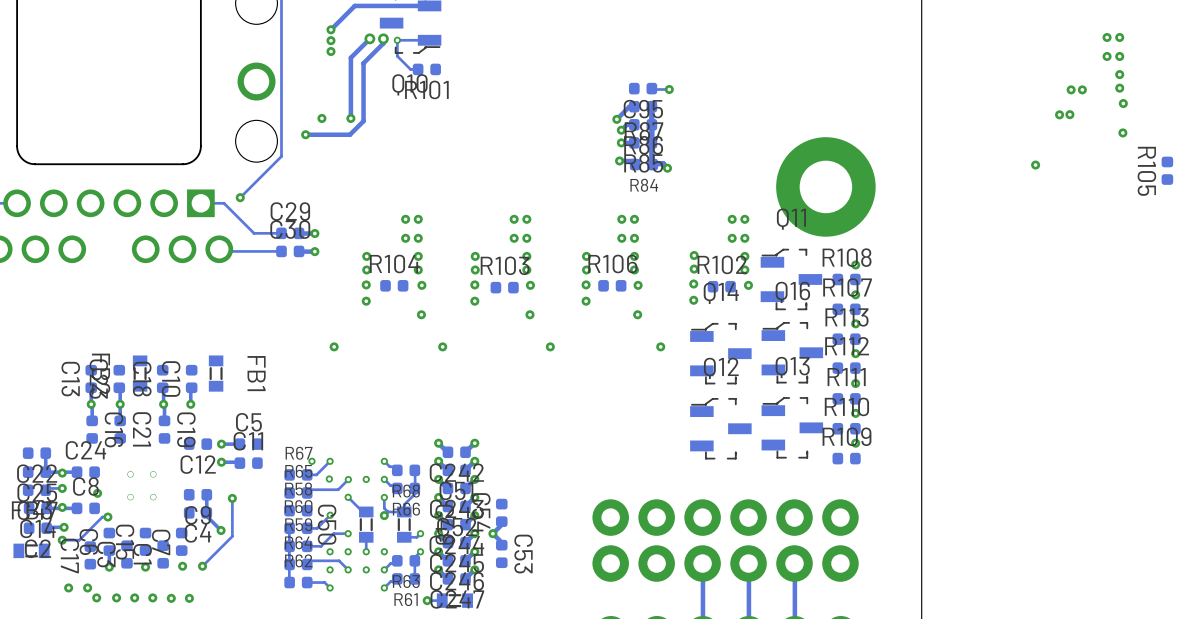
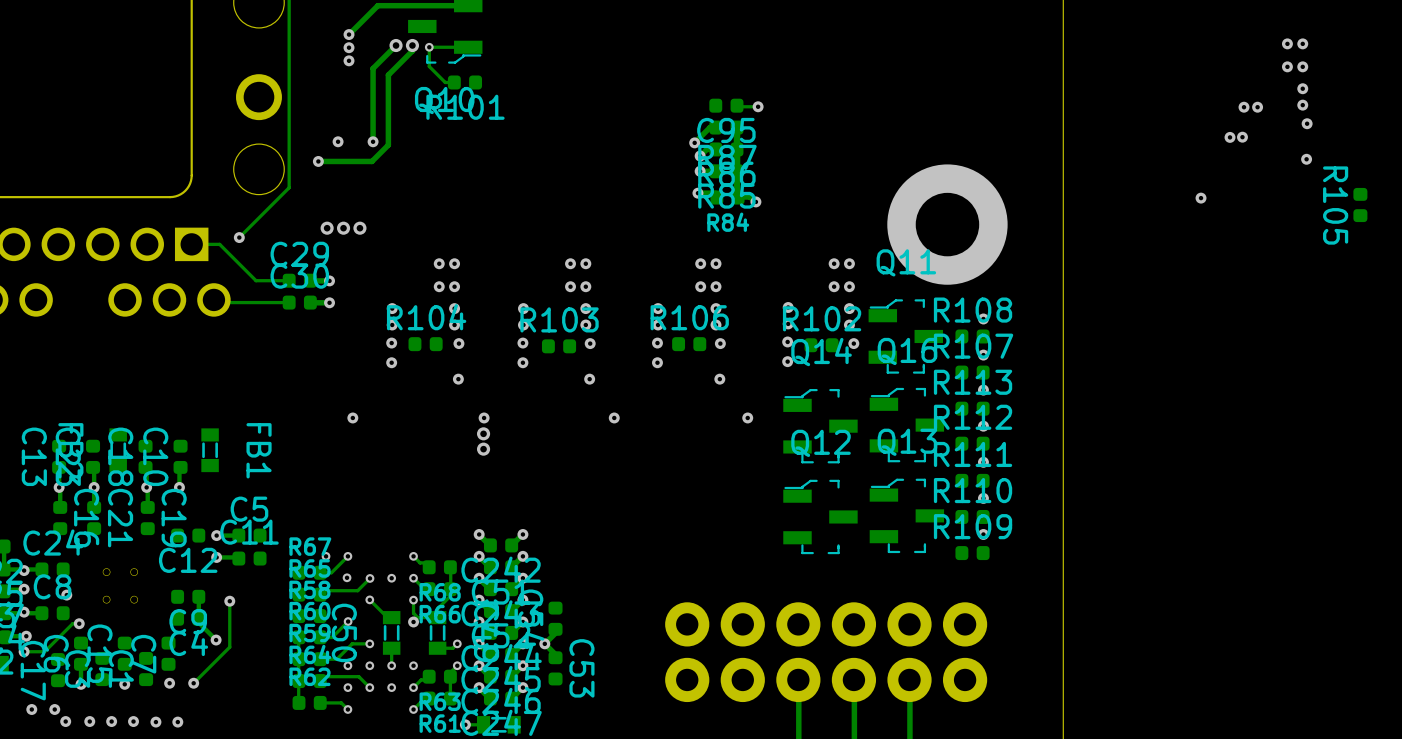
via: none -> (327, 228)
via: none -> (343, 228)
via: none -> (359, 228)
via: none -> (483, 433)
via: none -> (483, 449)

